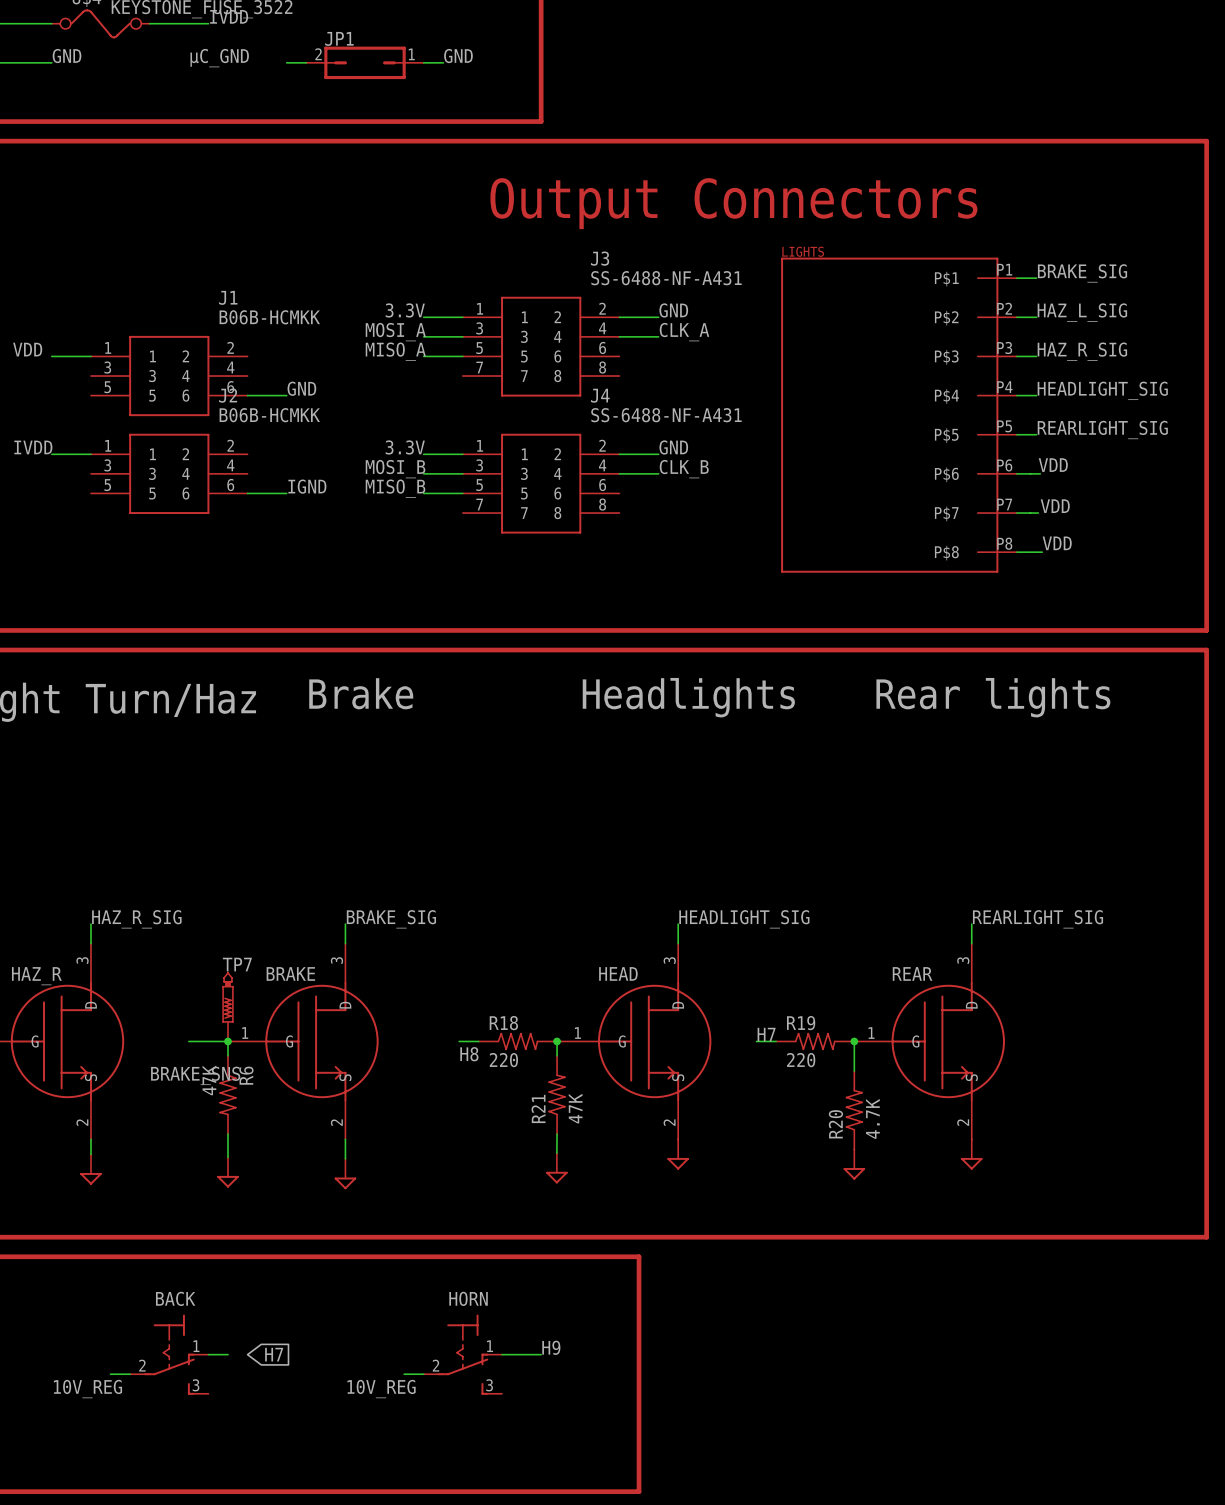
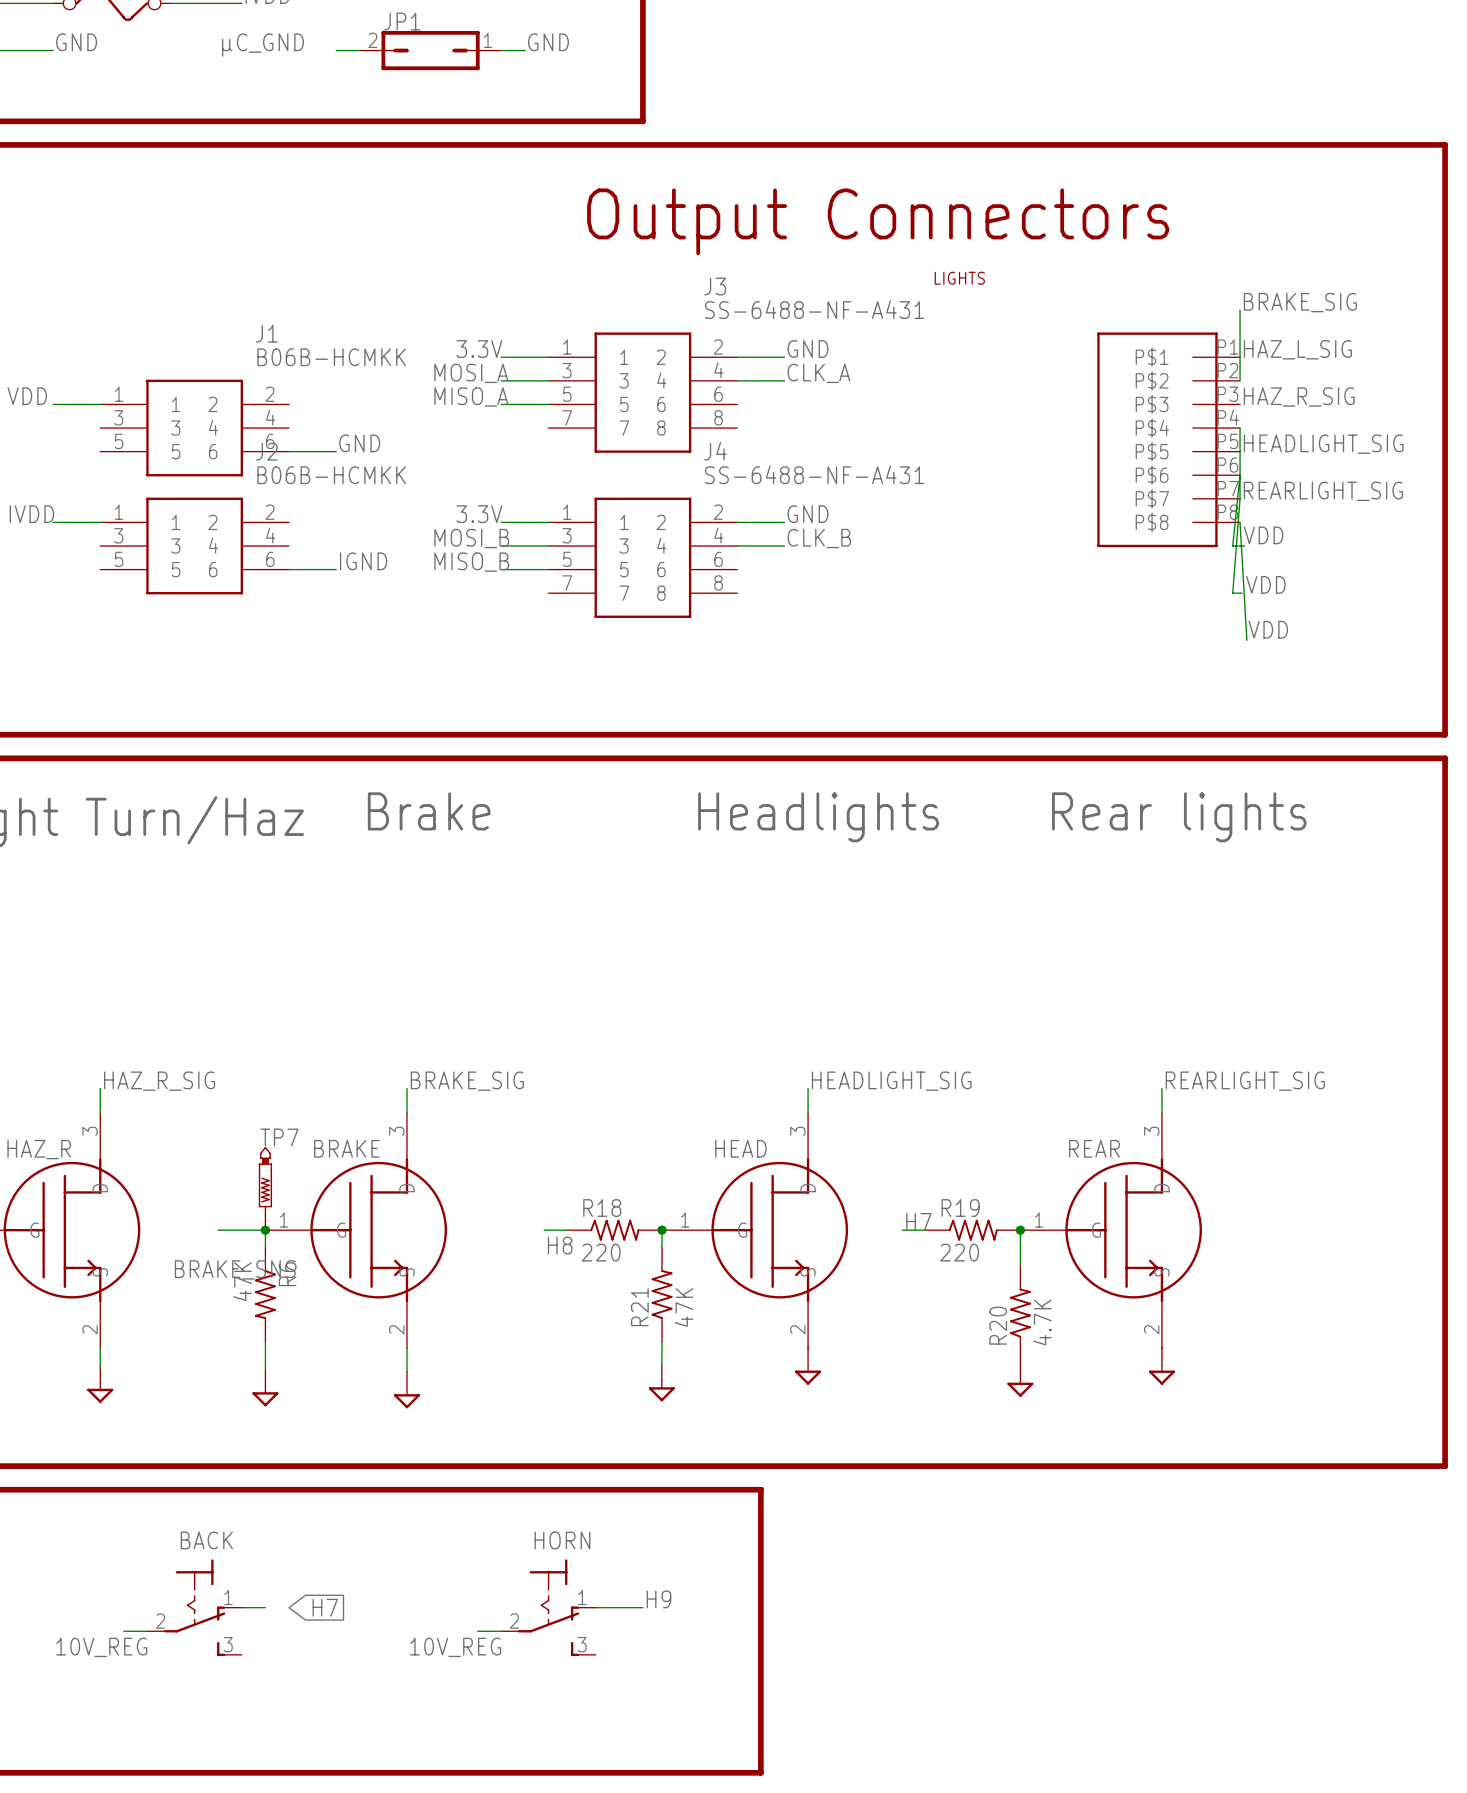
wire: (1016, 278) (1036, 278) -> (1240, 380) (1240, 310)
LIGHTS: none -> (1168, 439)
LIGHTS: (899, 415) -> none
wire: (1016, 473) (1030, 473) -> (1240, 475) (1232, 546)
wire: (1016, 513) (1030, 513) -> (1240, 428) (1240, 498) (1232, 593)
wire: (1016, 552) (1042, 552) -> (1240, 522) (1246, 640)

